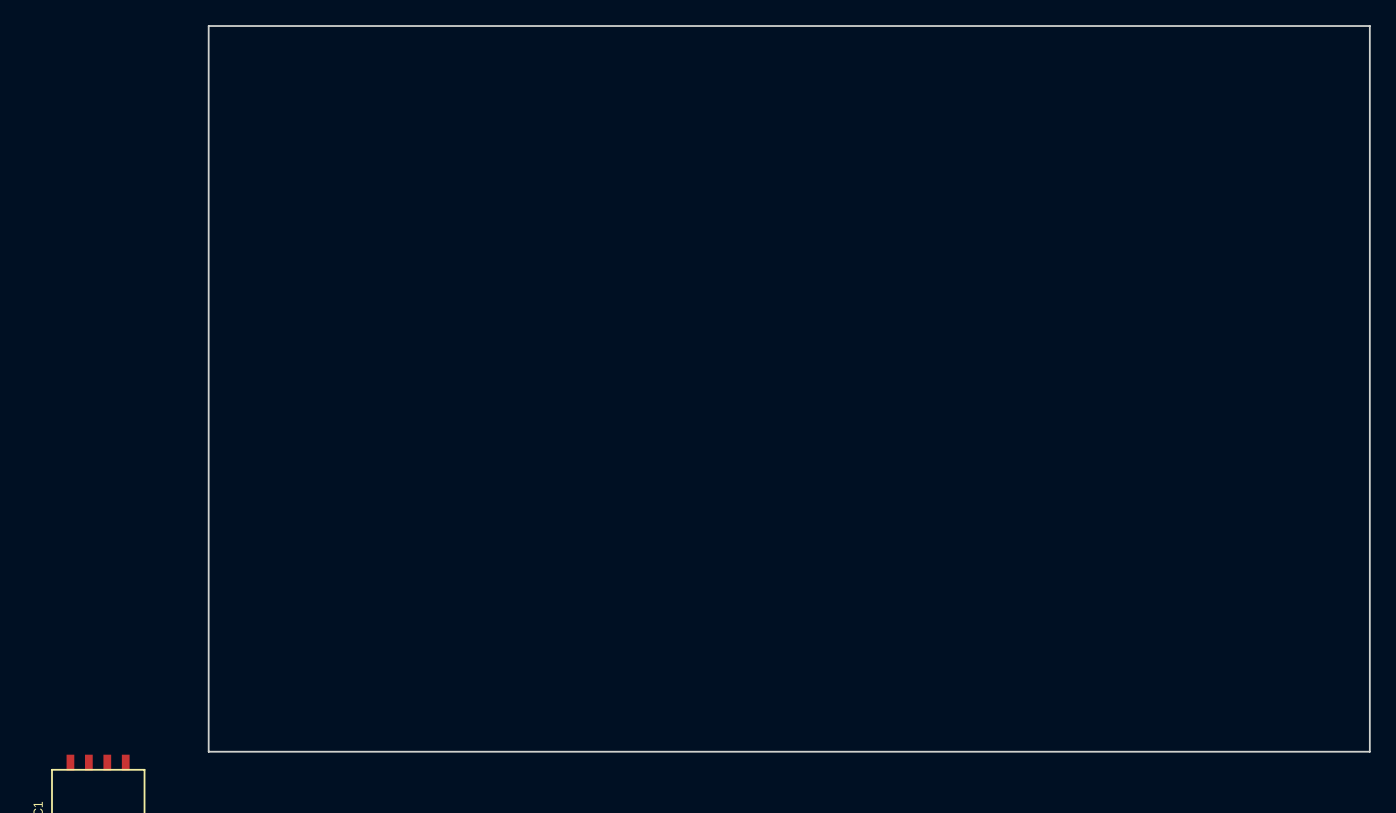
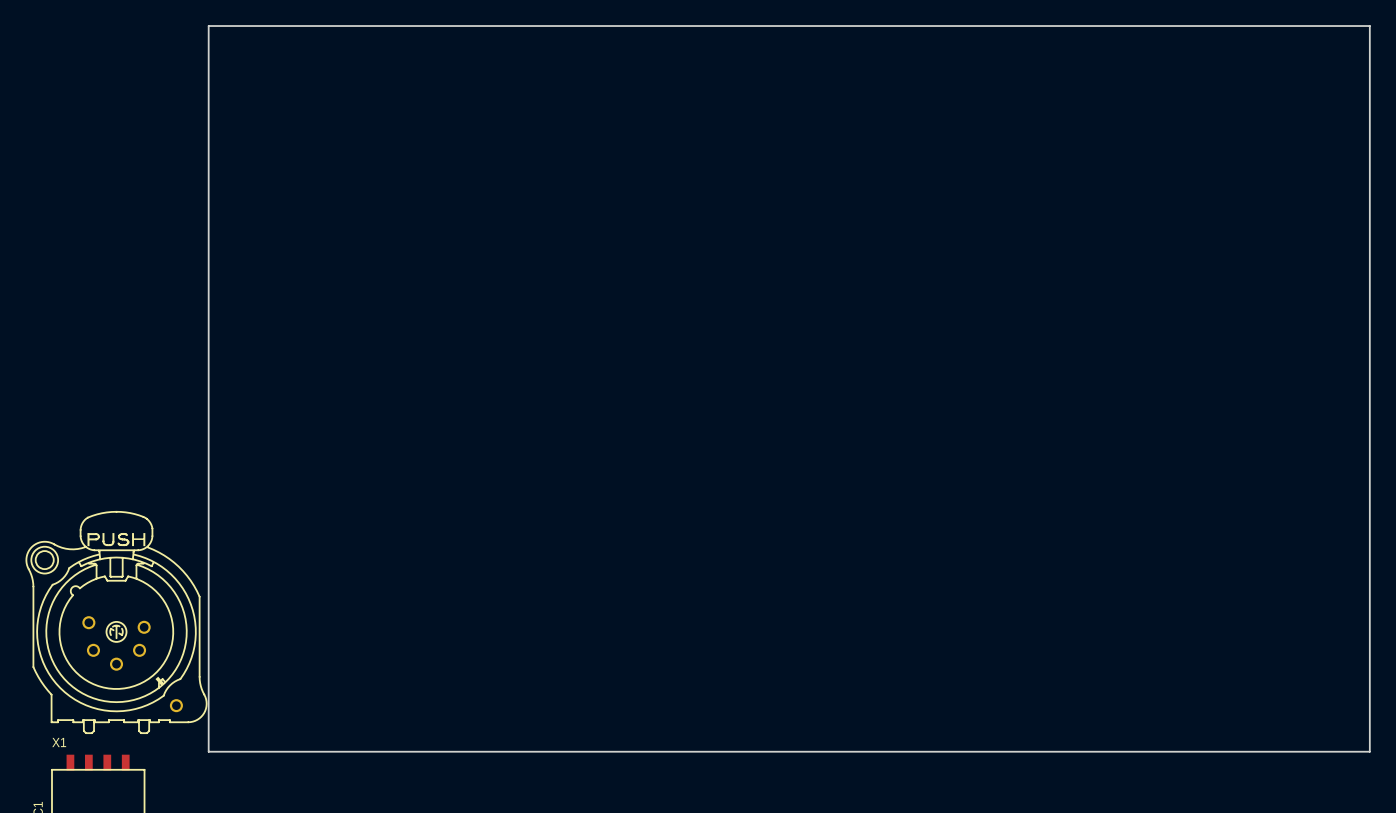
X1: none -> (116, 622)

